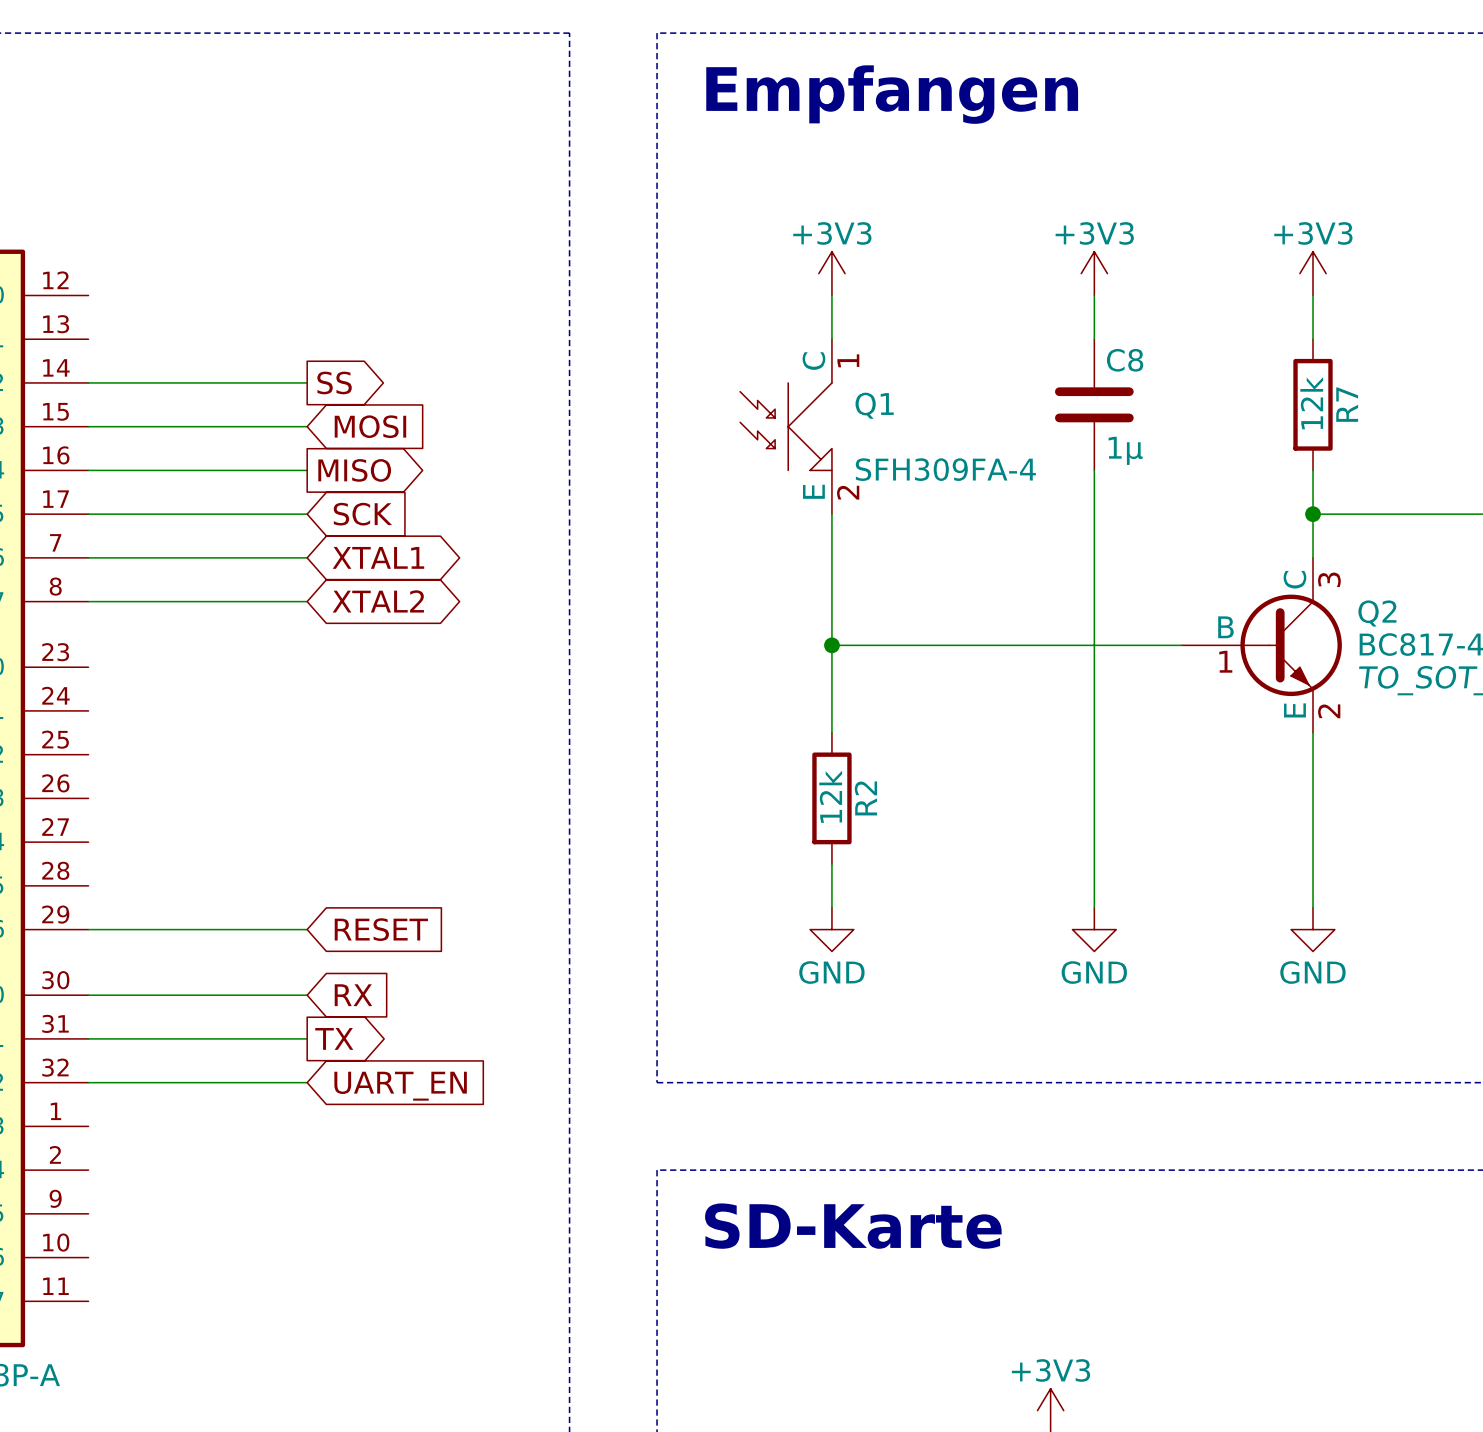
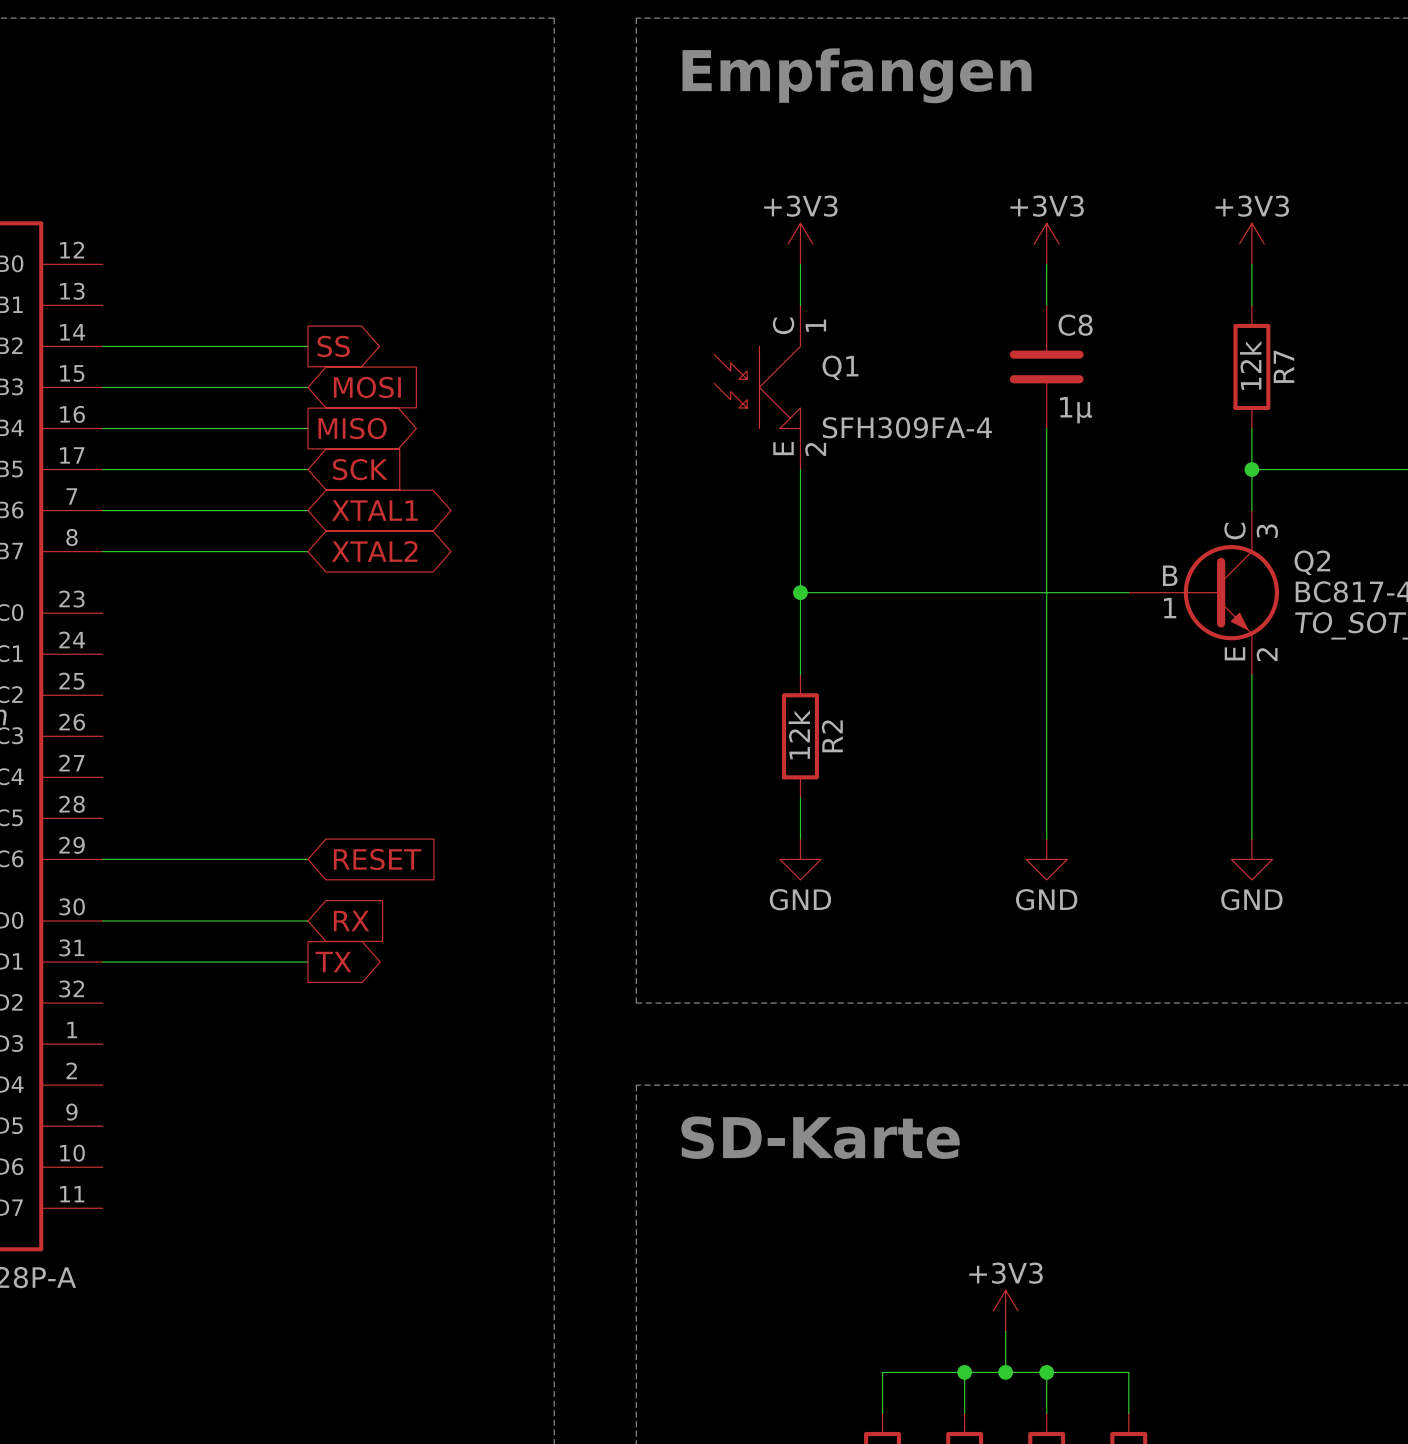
wire: (88, 1082) (307, 1082) -> none
global label: UART_EN (400, 1086) -> none

